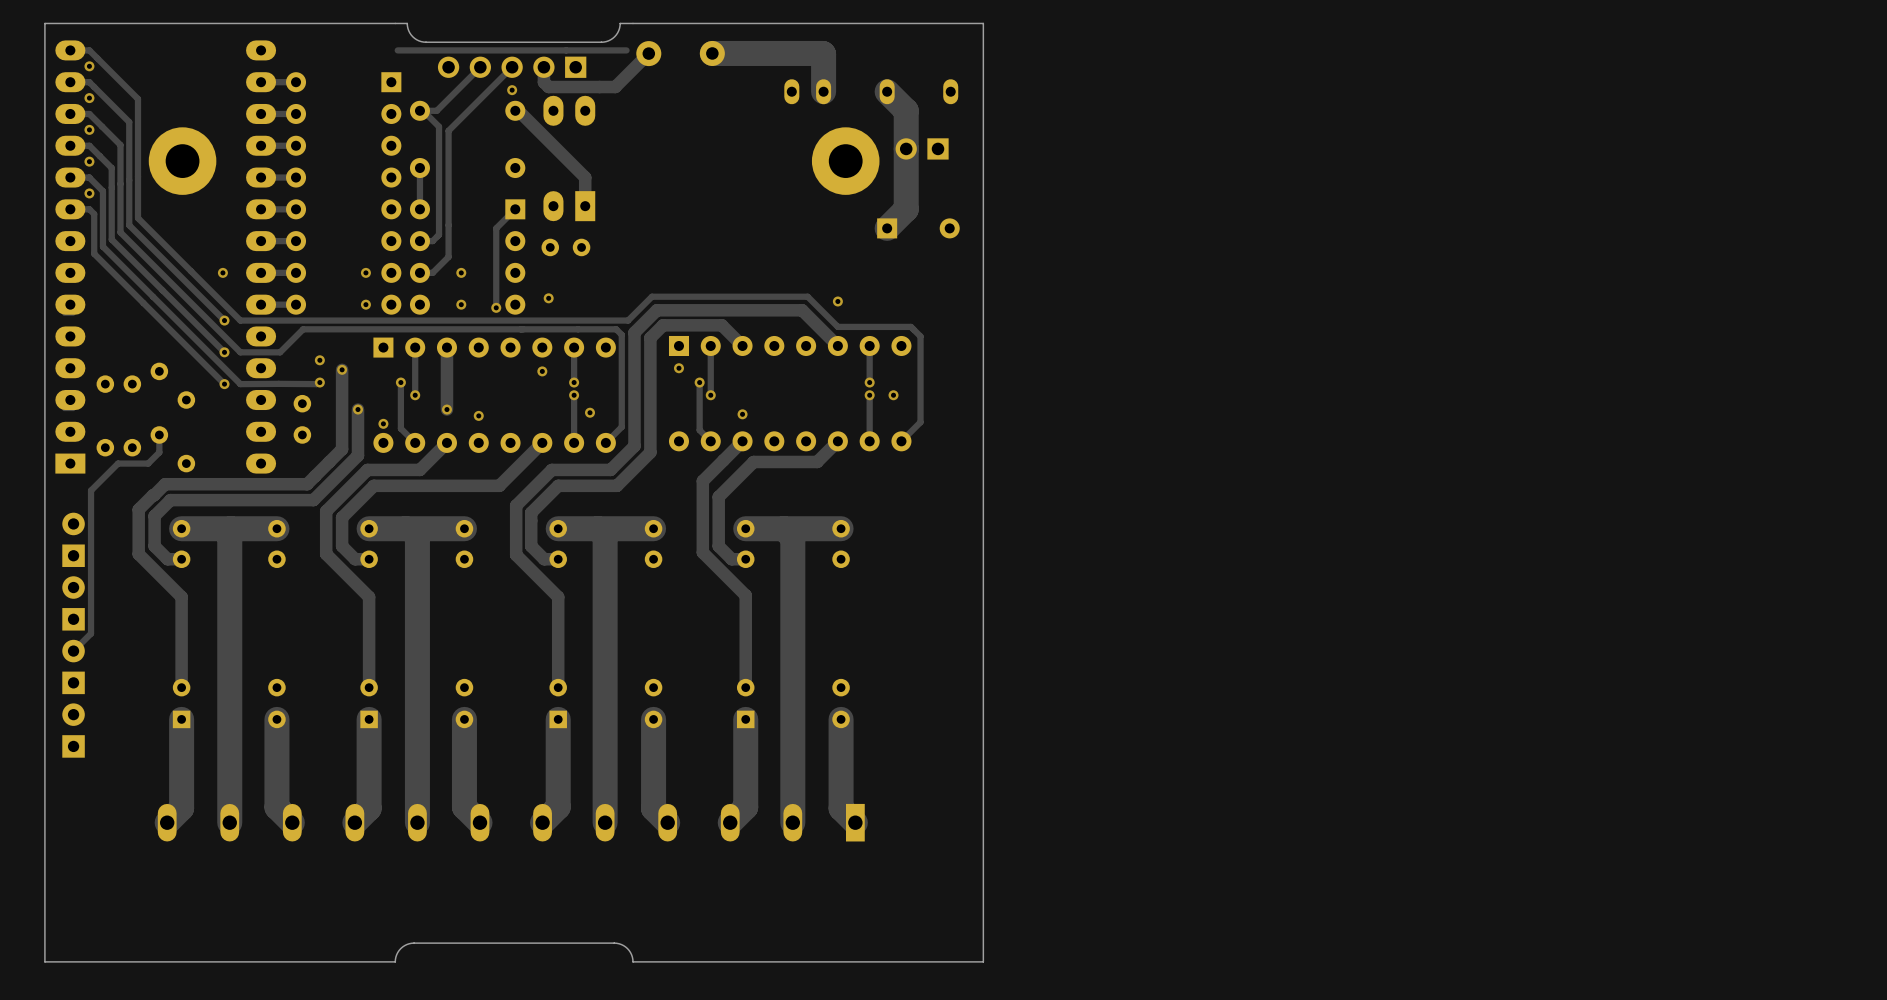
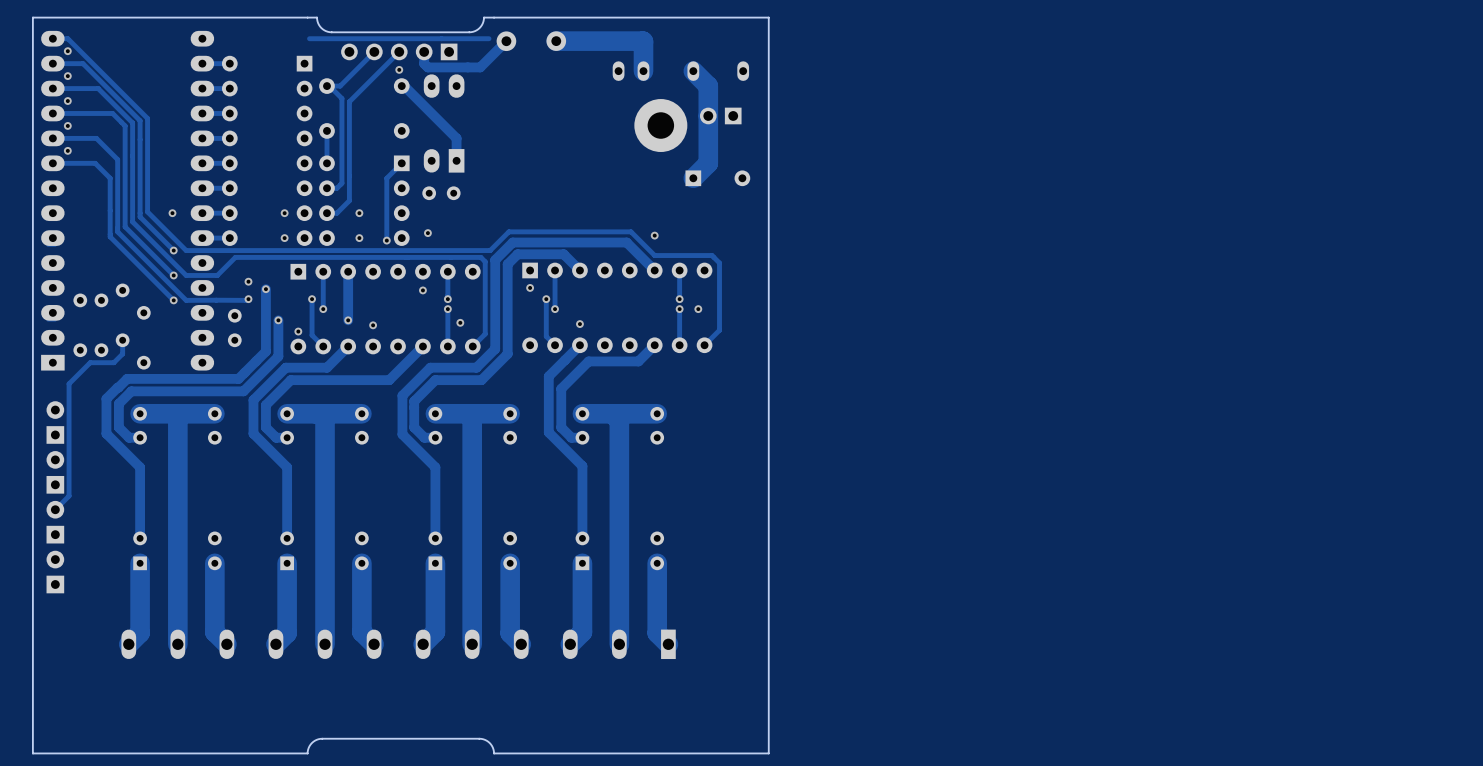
track: (89, 82) (129, 122) (129, 225) (181, 277) -> (67, 63) (83, 63) (140, 120) (140, 216)
track: (138, 98) (138, 218) (191, 271) -> (105, 76) (147, 118) (147, 211)
track: (89, 113) (120, 145) (120, 232) (172, 284) -> (67, 88) (98, 88) (132, 122) (132, 221)
track: (89, 145) (111, 168) (111, 239) (162, 290) -> (67, 113) (112, 113) (125, 125) (125, 226)
part: (182, 161) -> none
track: (89, 177) (102, 191) (102, 246) (153, 296) -> (67, 138) (96, 138) (117, 159) (117, 231)
track: (89, 209) (94, 214) (94, 253) (143, 303) -> (67, 163) (95, 163) (110, 178) (110, 236)

